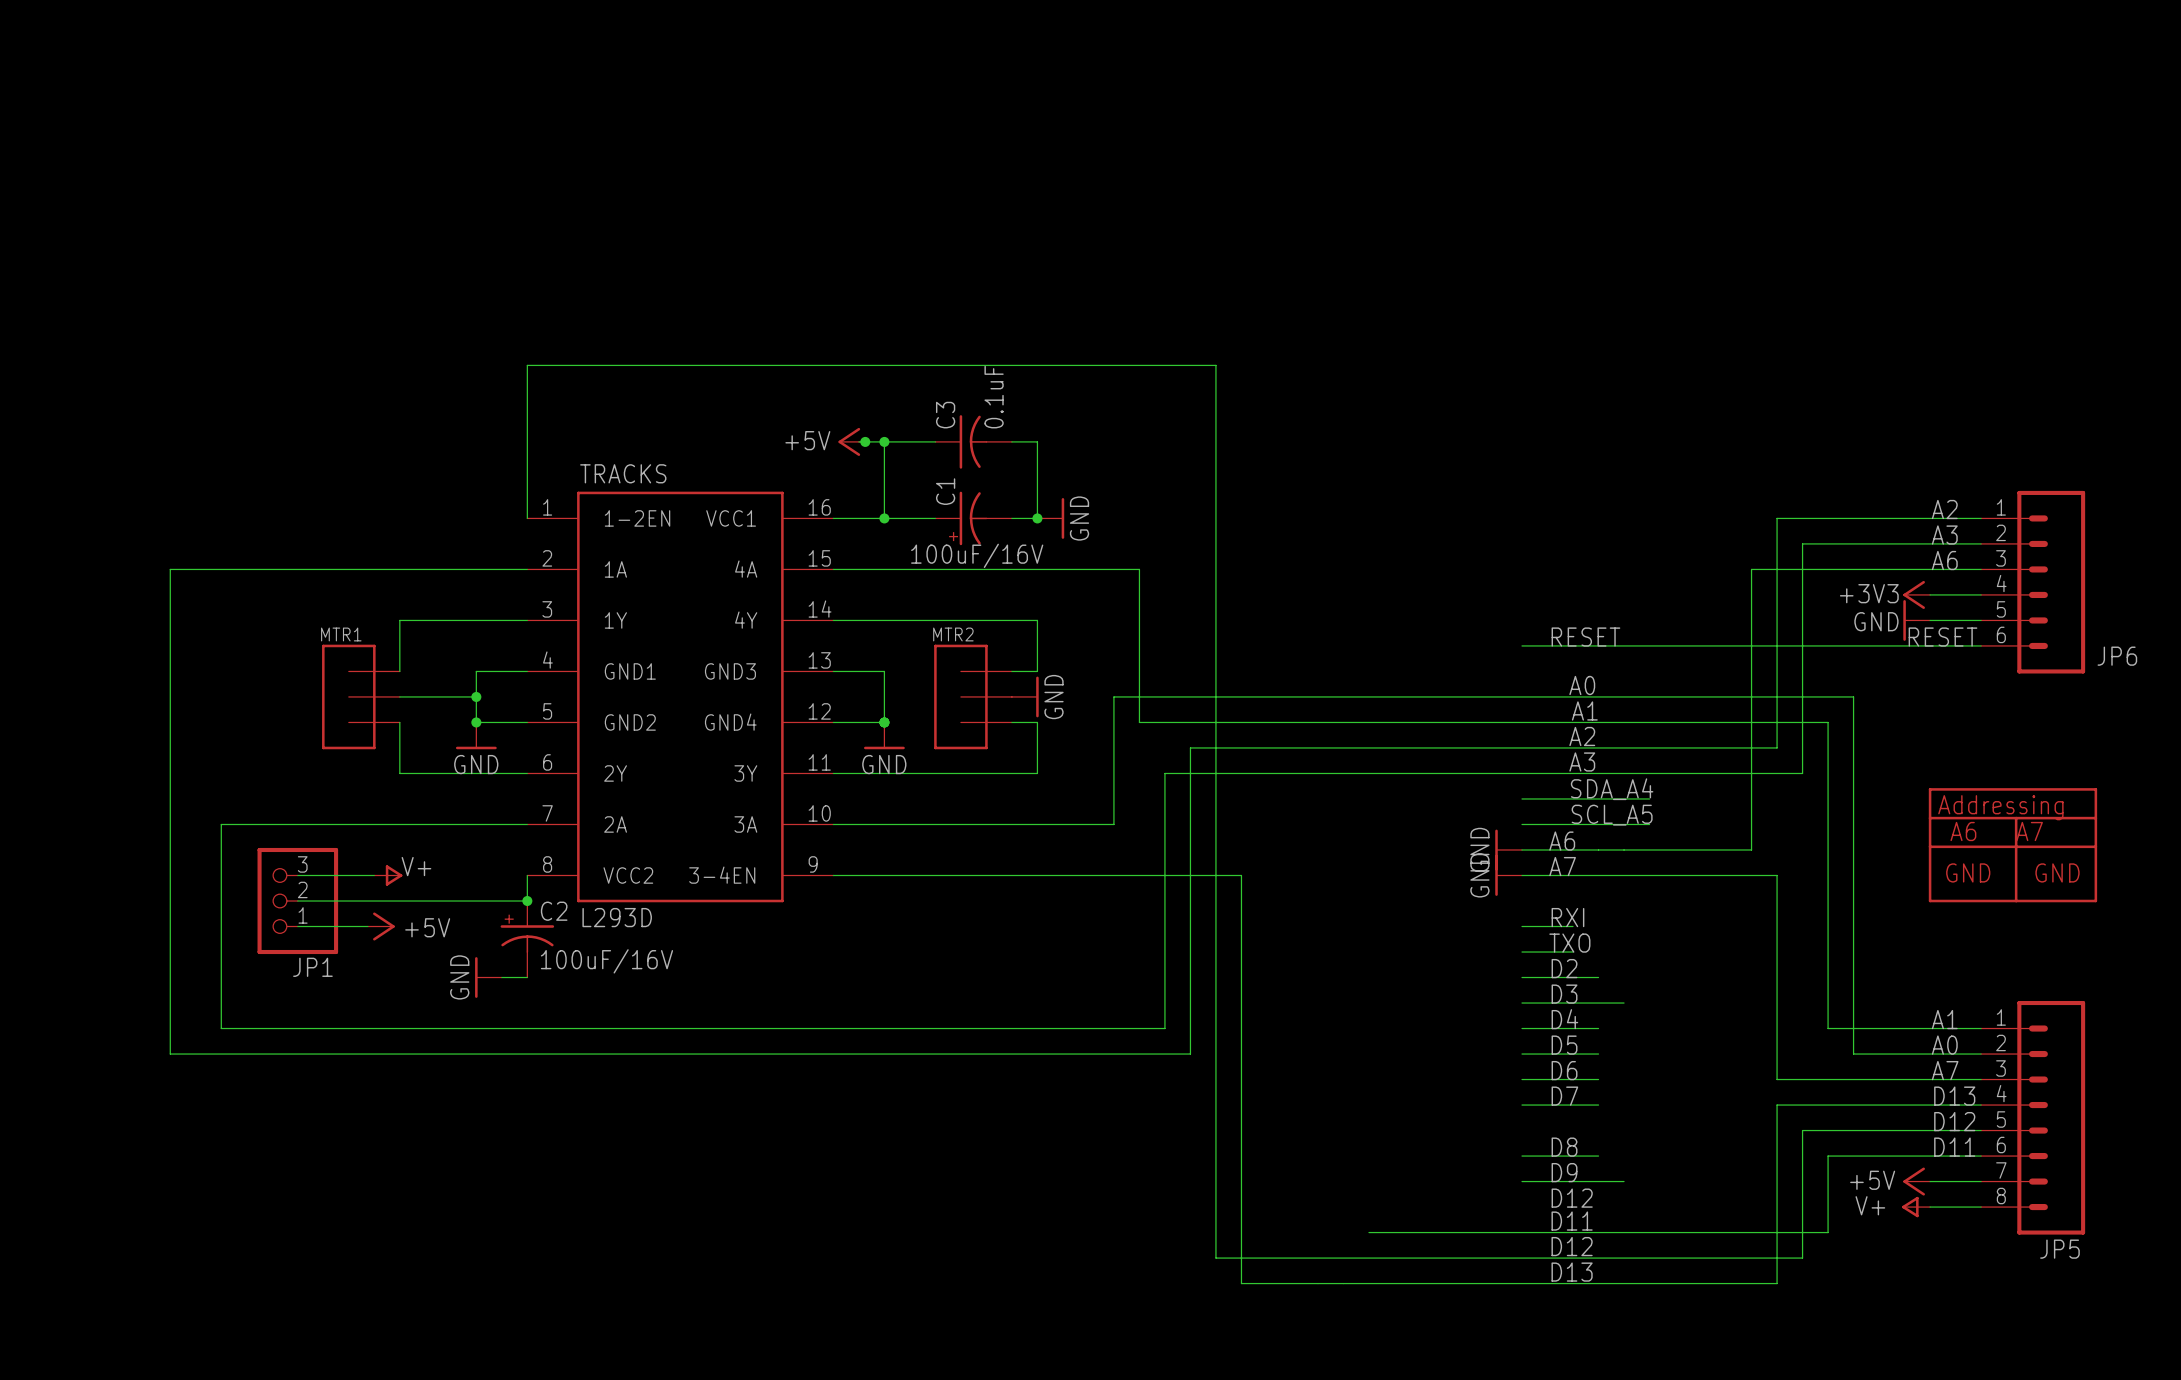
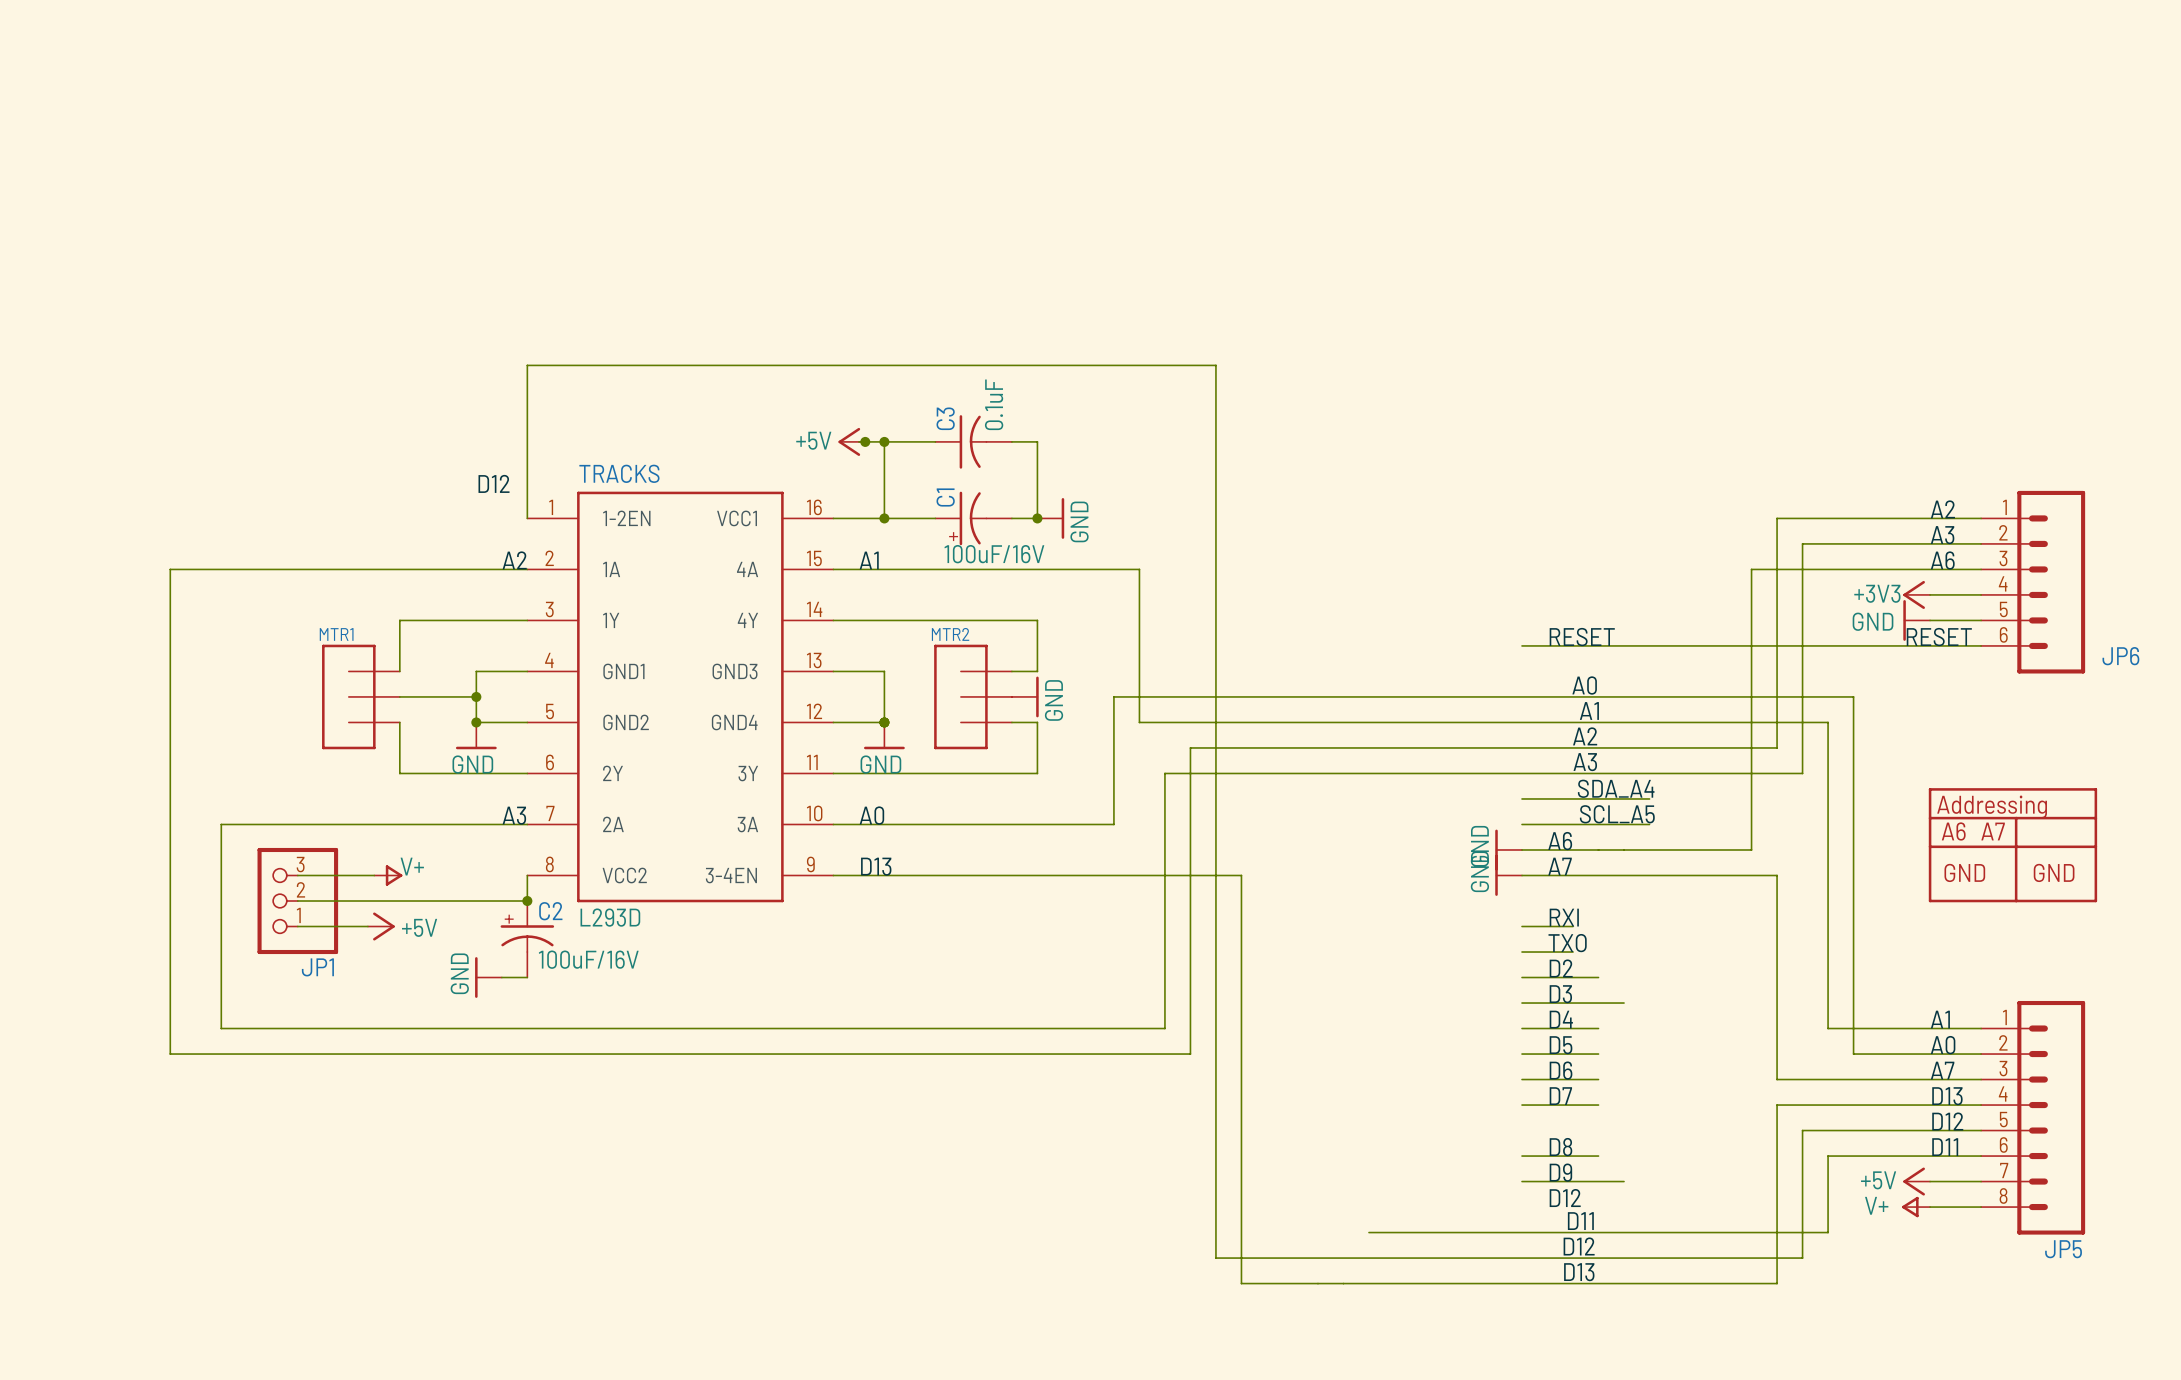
label: none -> D12 (494, 483)
label: none -> A2 (514, 560)
label: none -> A1 (869, 560)
label: none -> A3 (514, 815)
label: none -> A0 (871, 815)
label: none -> D13 (876, 866)

